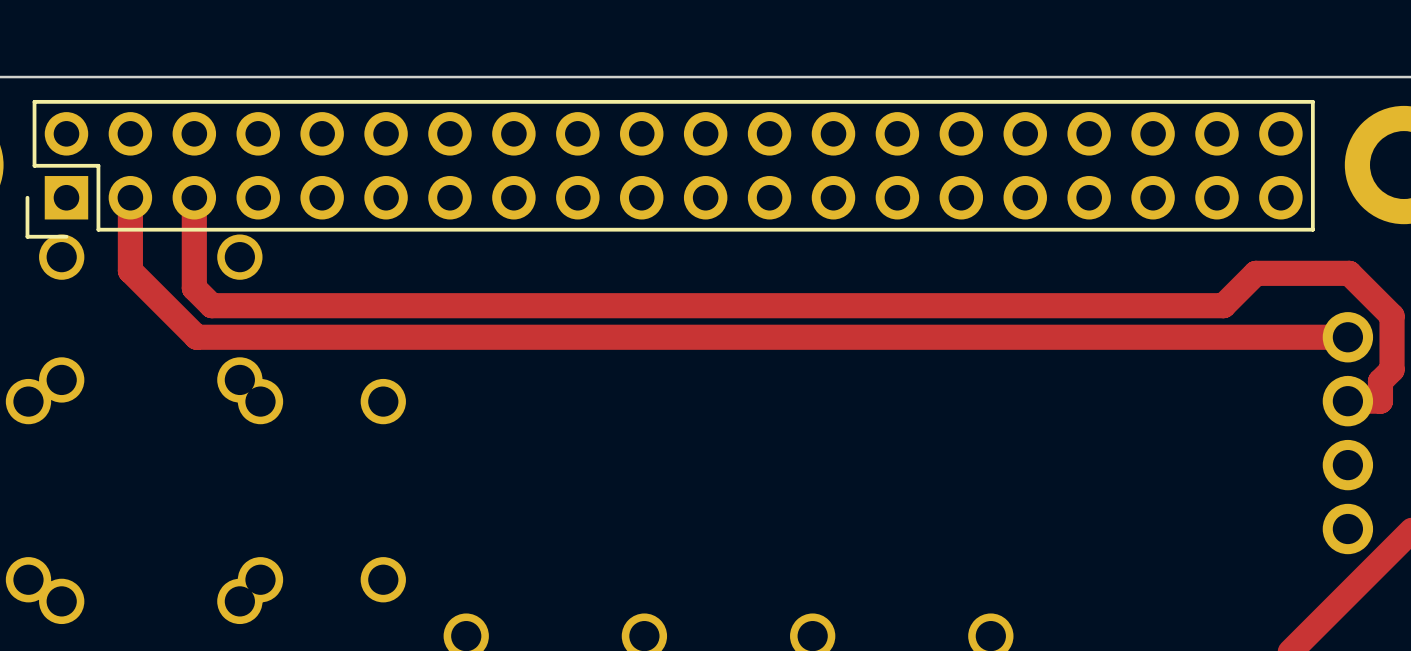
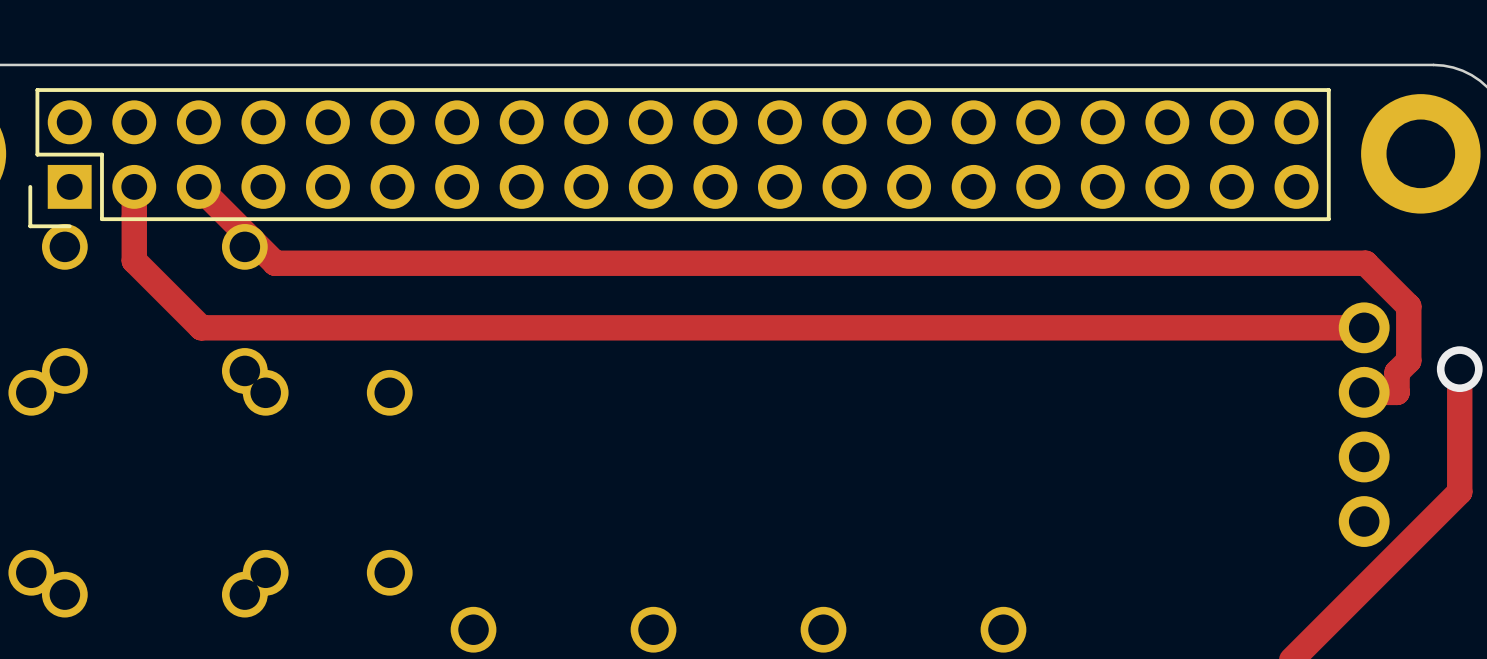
track: (194, 197) (194, 288) (211, 305) (1223, 305) (1255, 273) -> (198, 186) (275, 263) (1271, 263)

